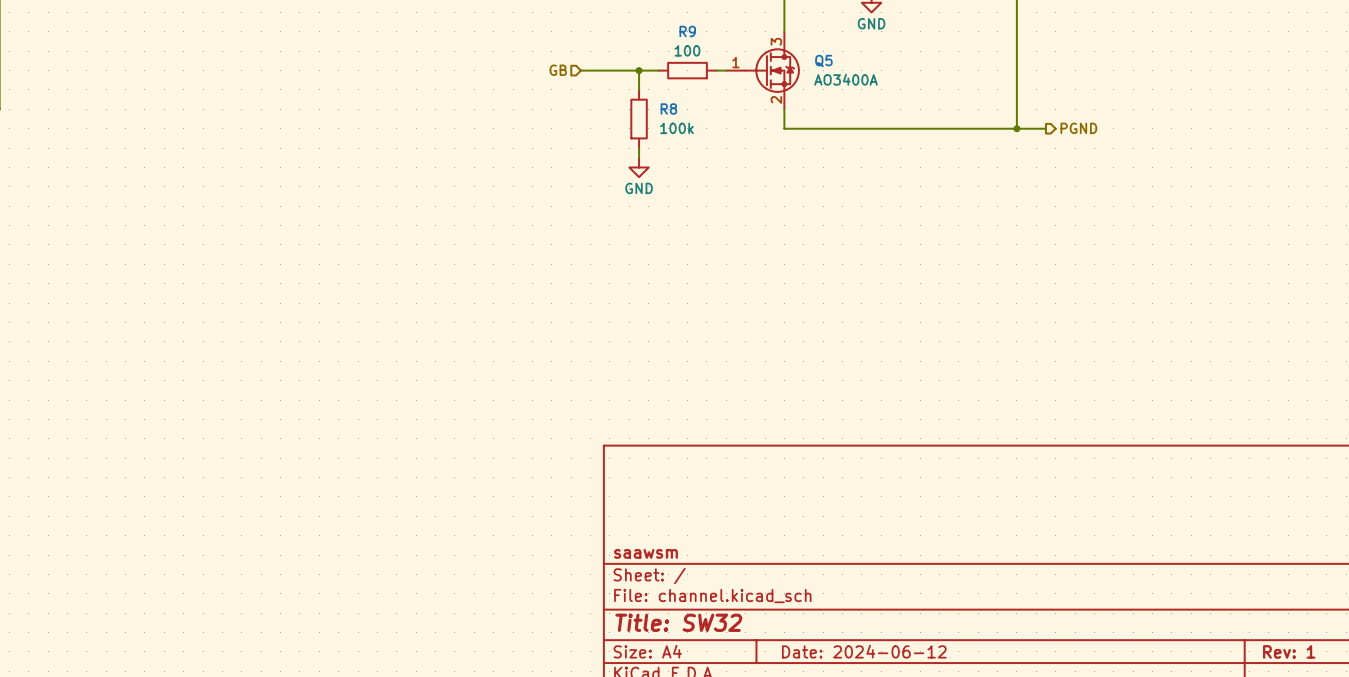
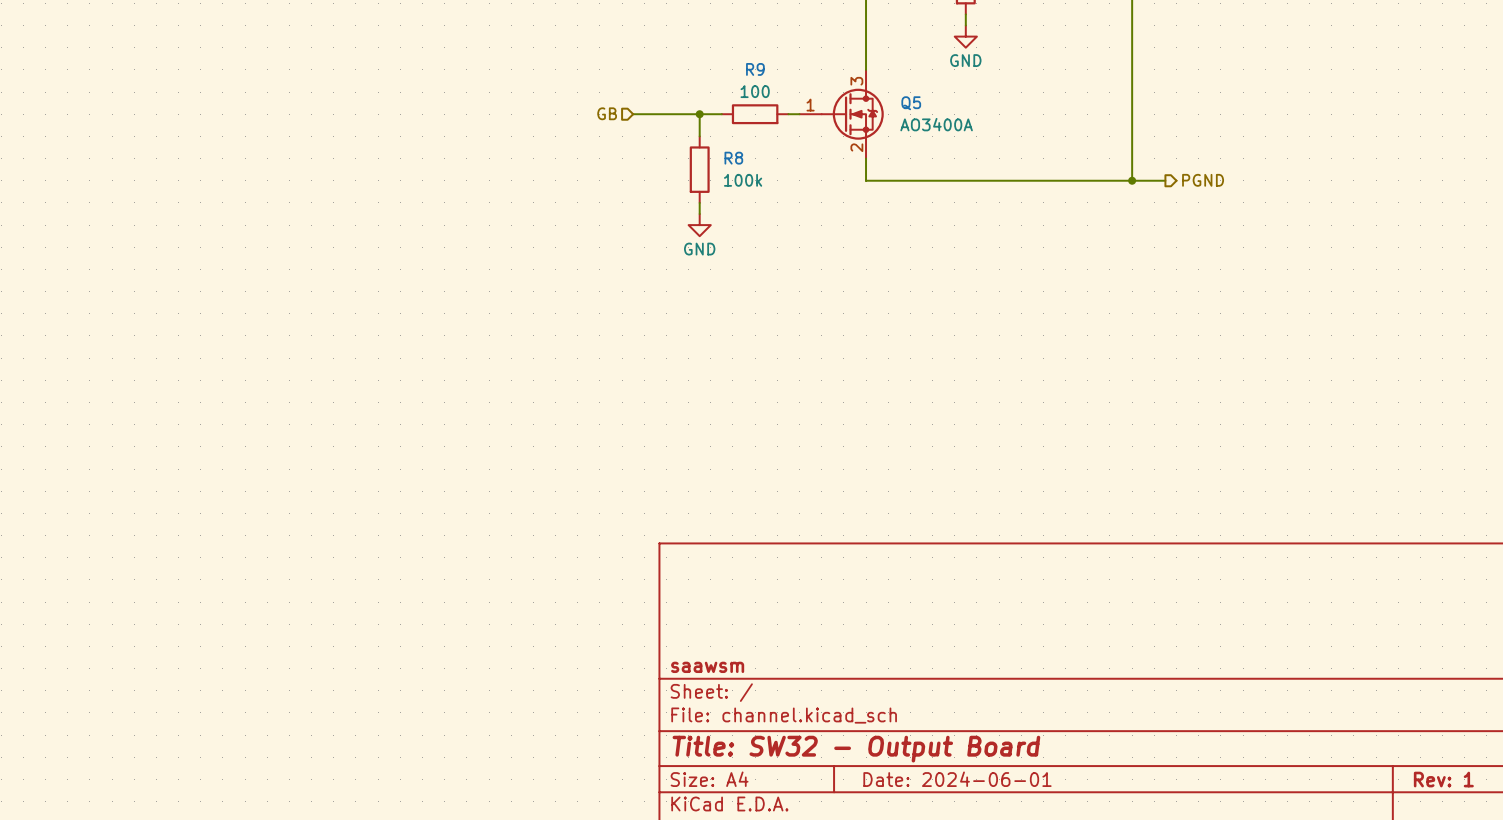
title block: Title: SW32 (678, 622) -> Title: SW32 - Output Board (856, 749)
title block: Date: 2024-06-12 (864, 651) -> Date: 2024-06-01 (957, 779)

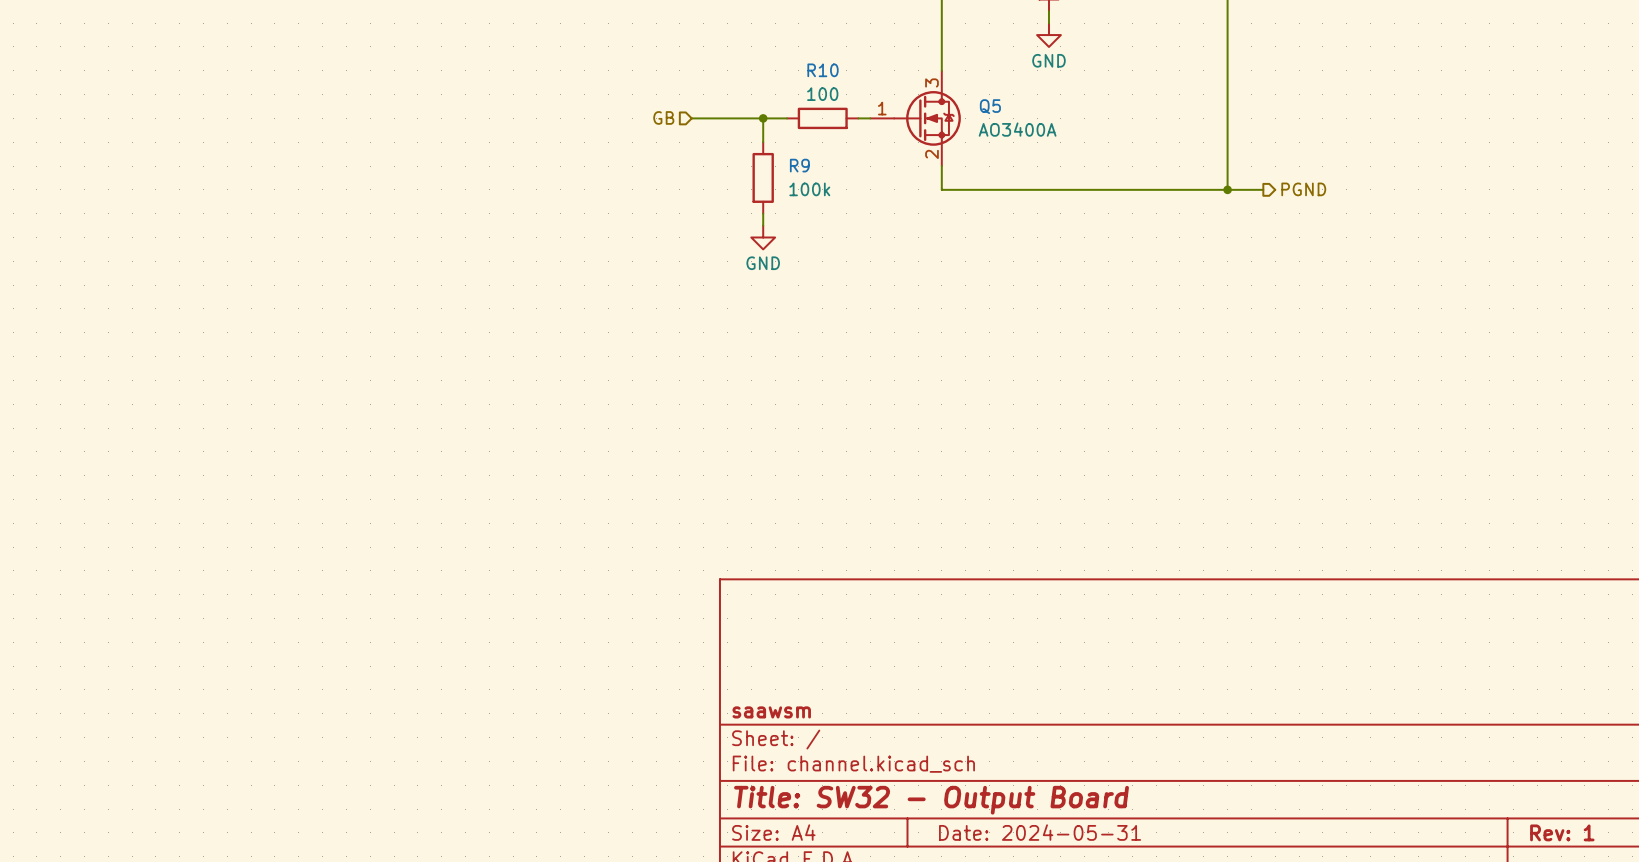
R9 name: R9 (755, 69) -> R10 (823, 70)
R8 name: R8 (733, 158) -> R9 (799, 165)
title block: Date: 2024-06-01 (957, 779) -> Date: 2024-05-31 (1040, 832)

